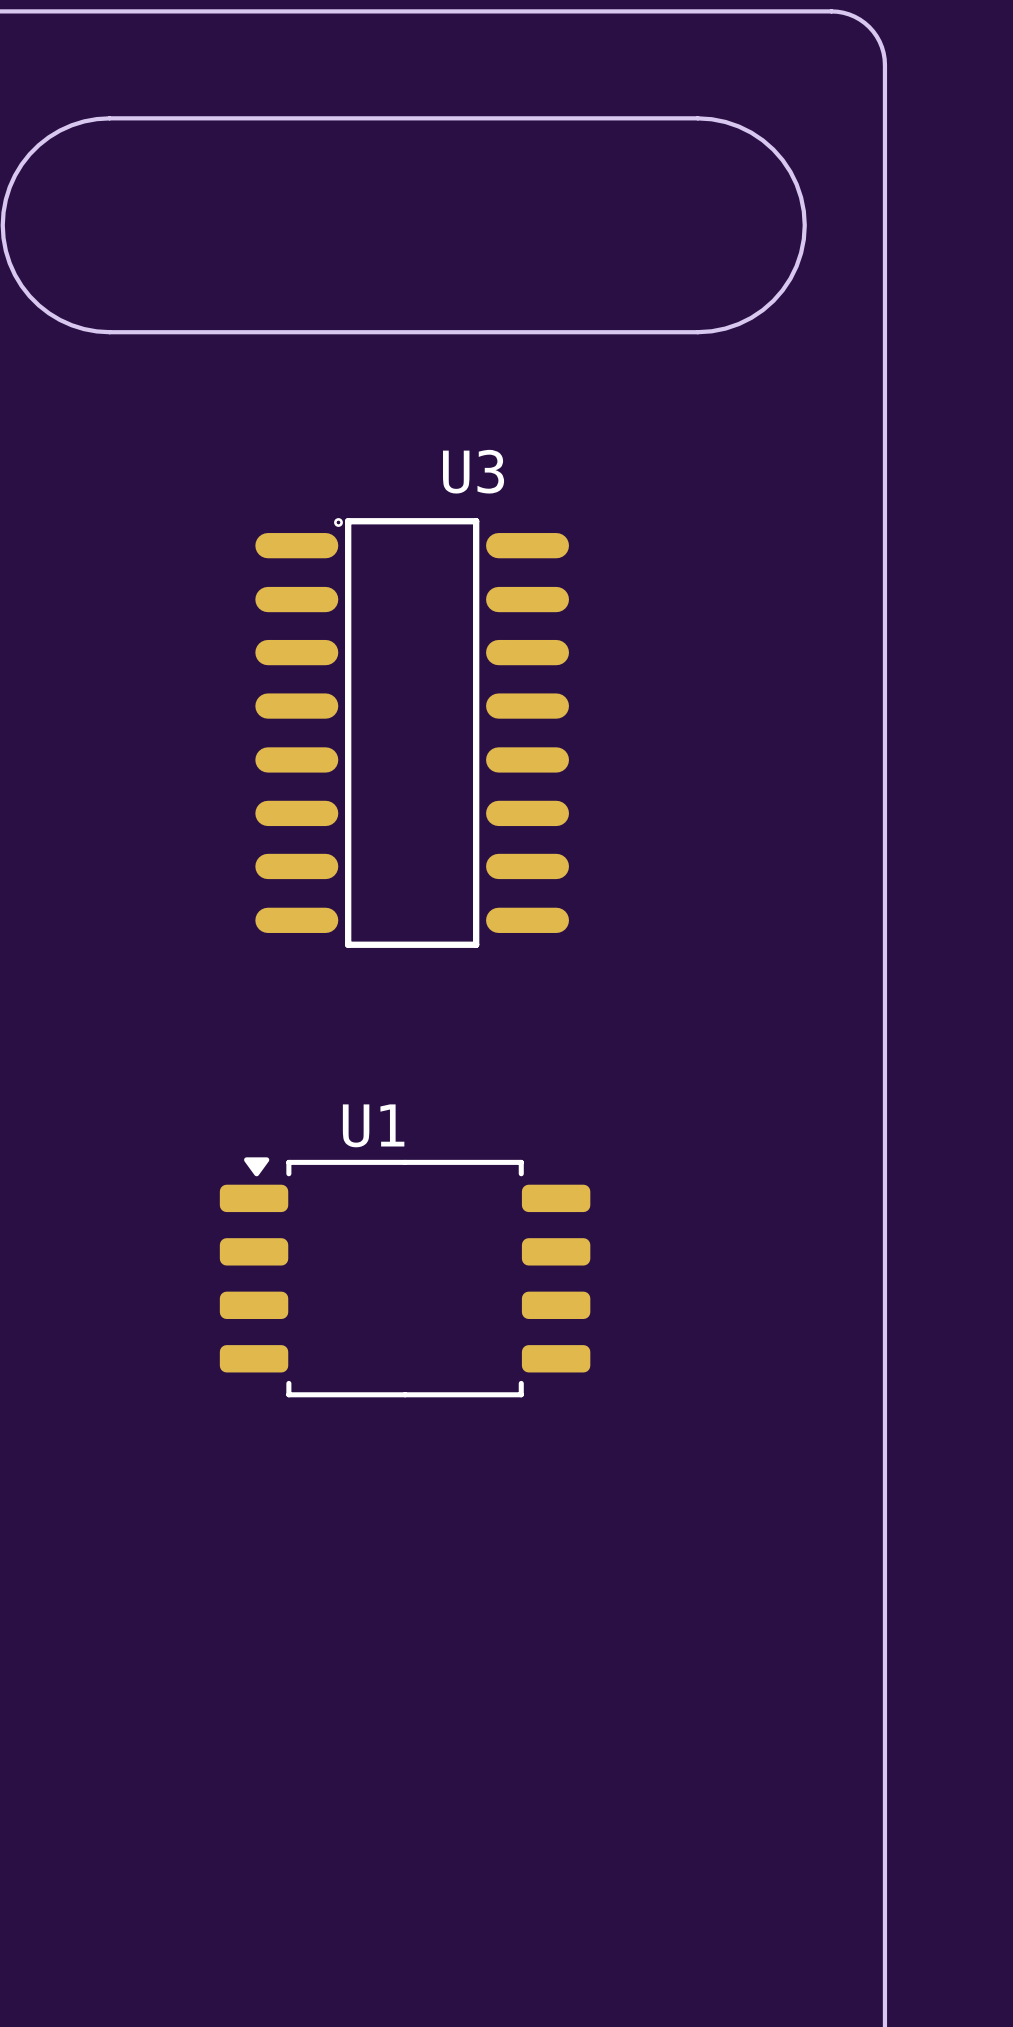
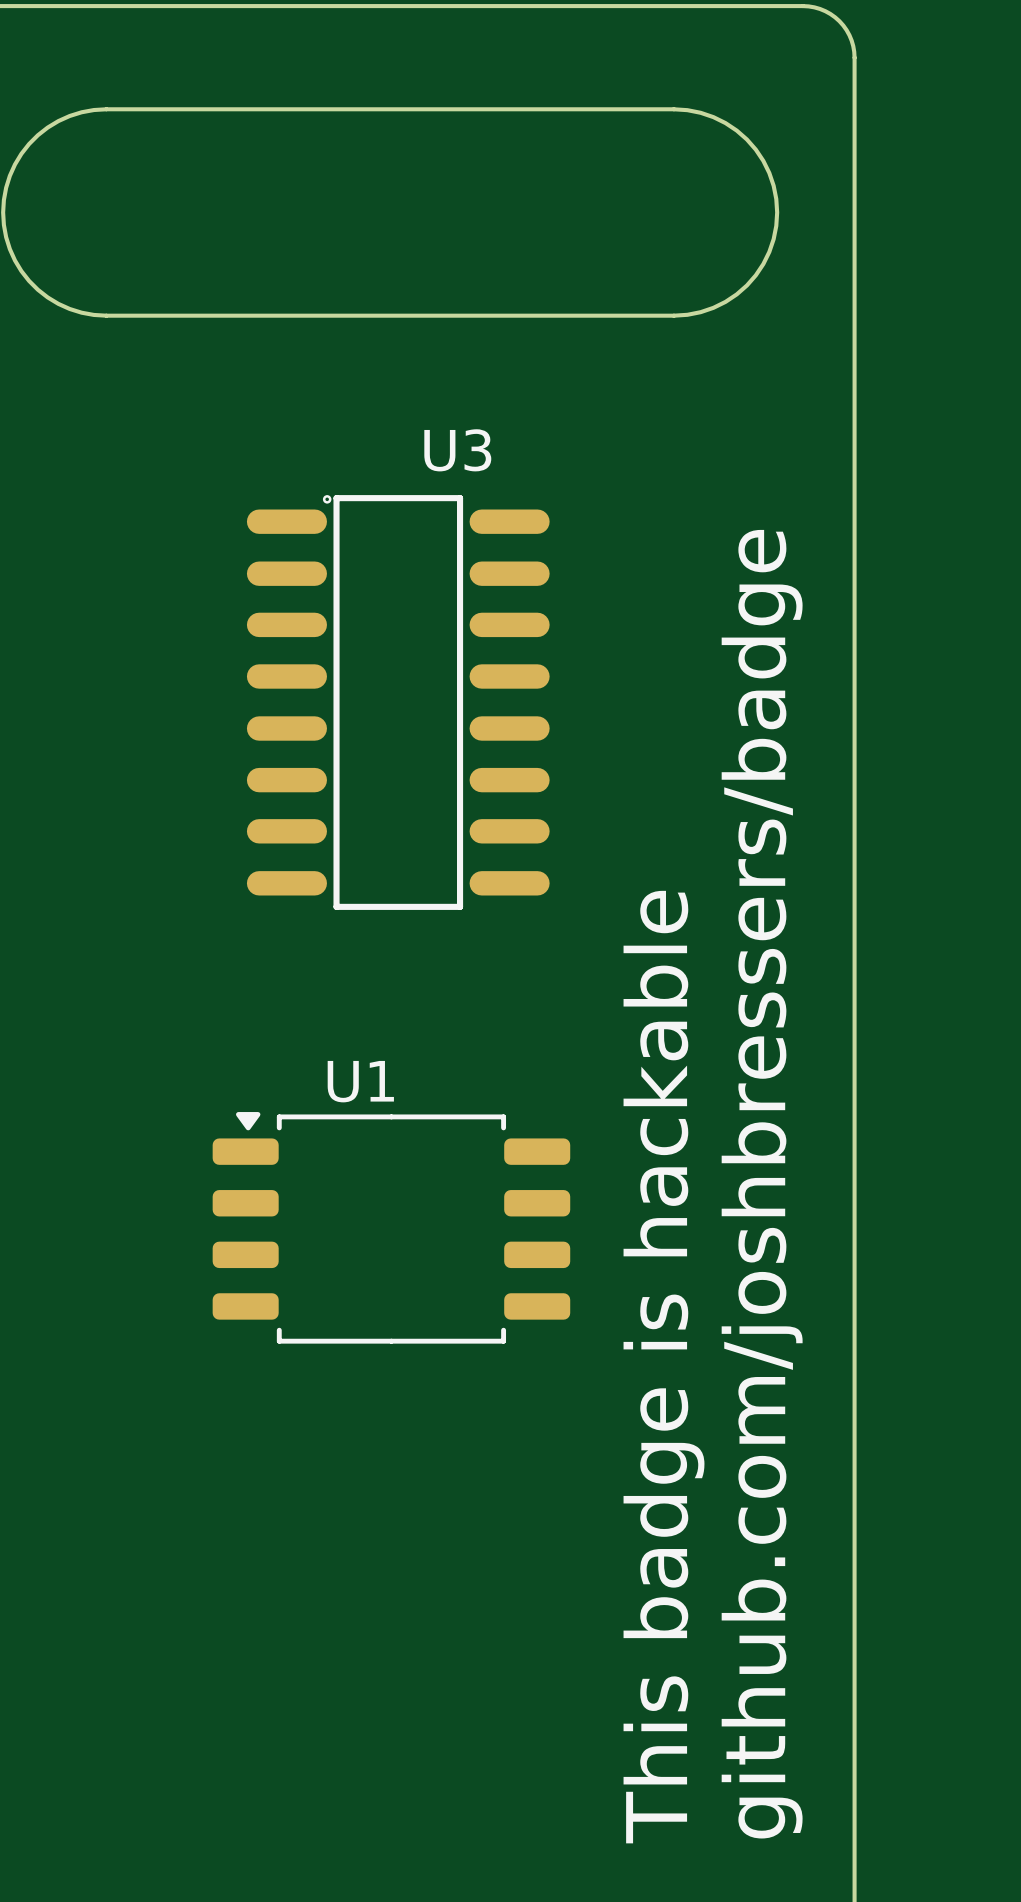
text: none -> github.com/joshbressers/badge (762, 1184)
text: none -> This badge is hackable (664, 1367)

